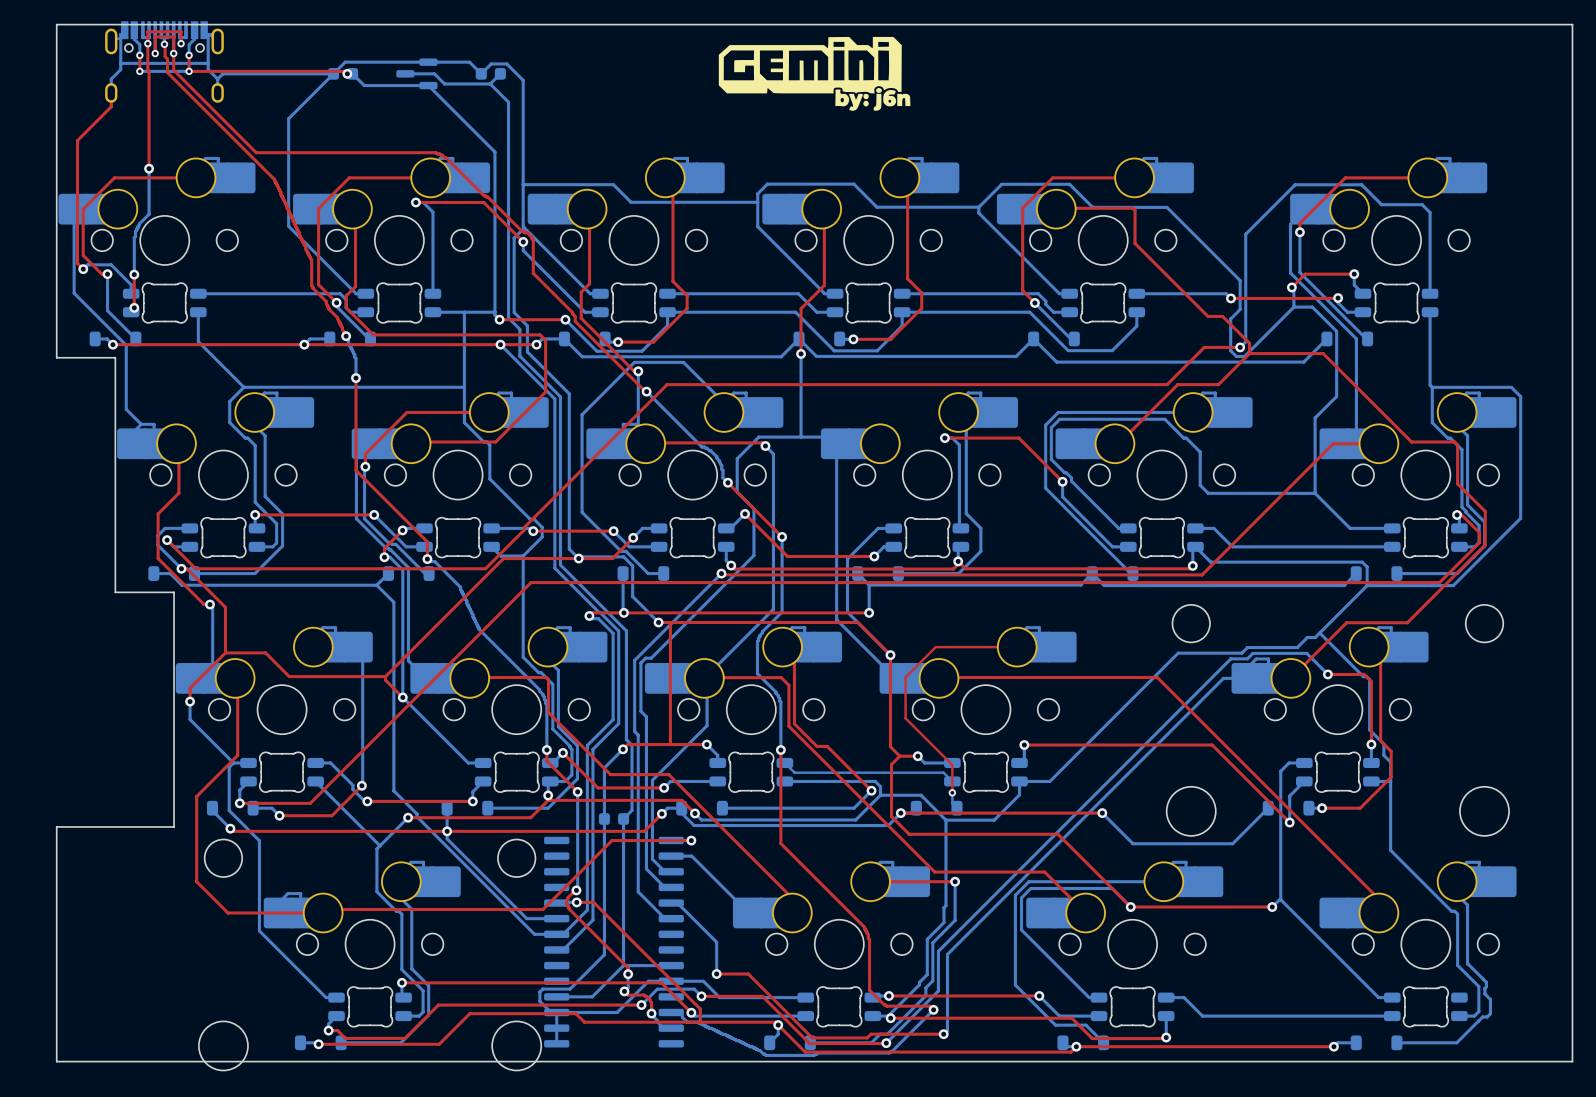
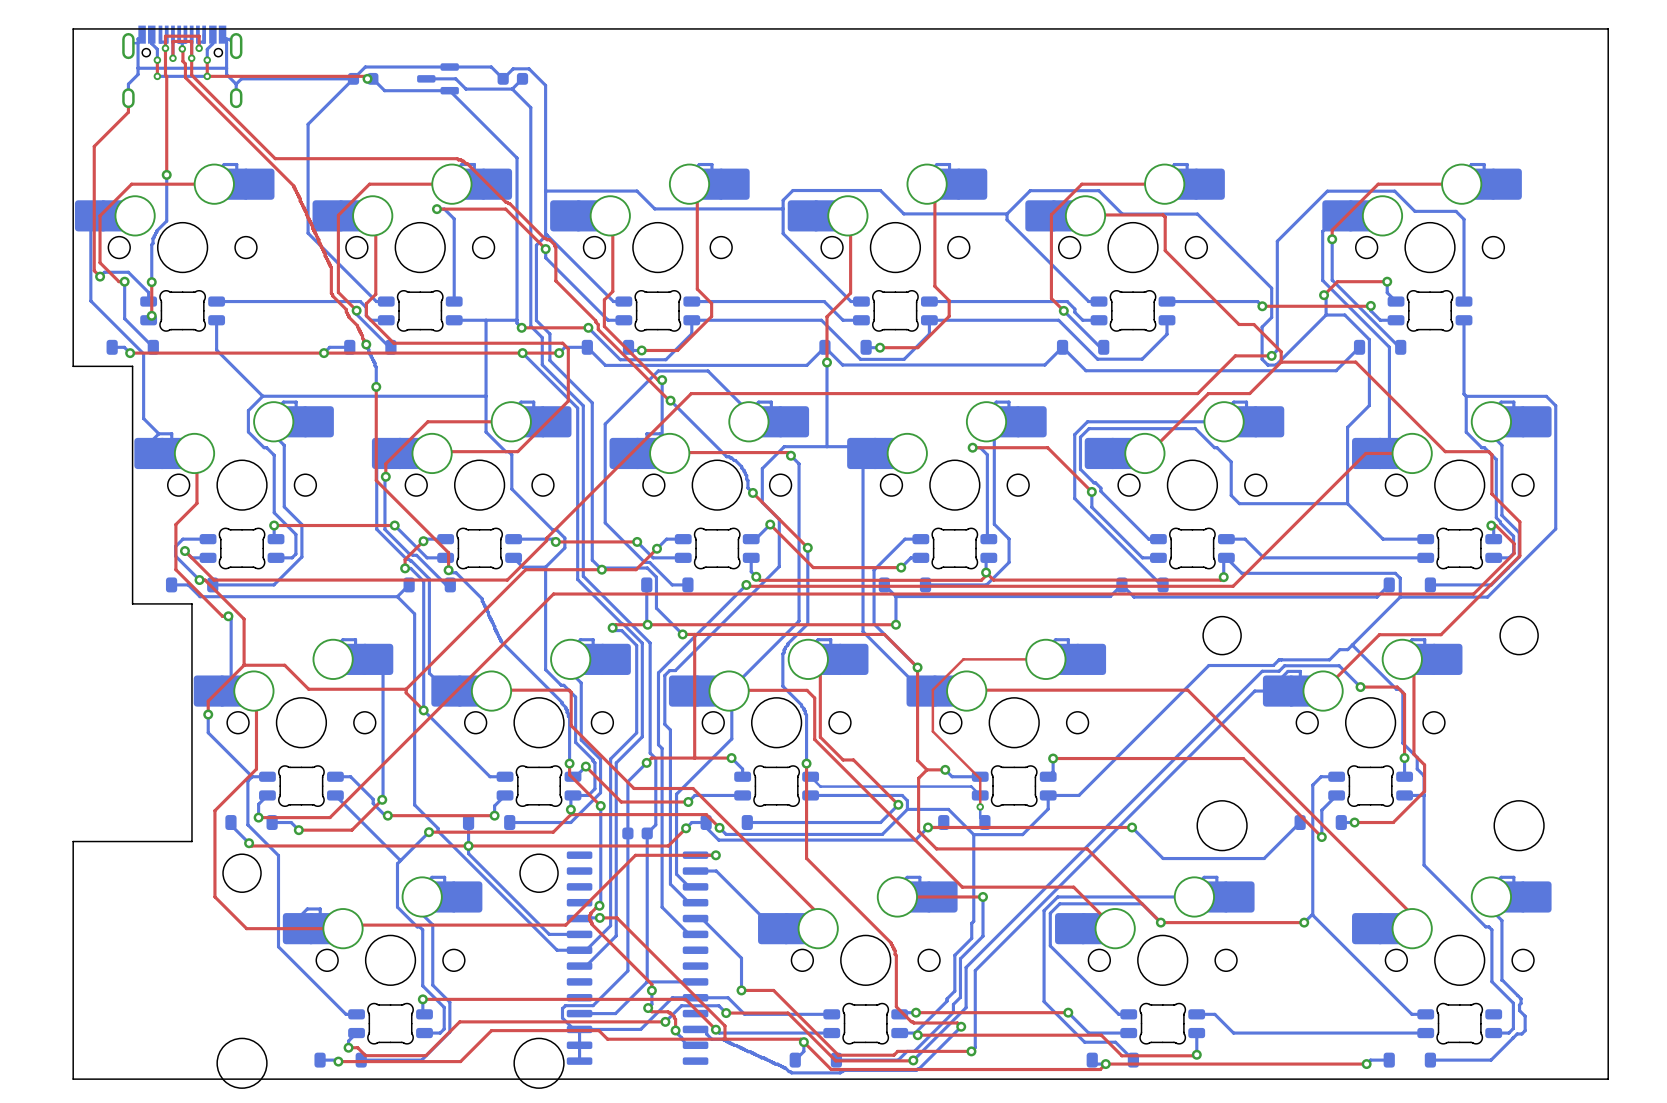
drawing: [718, 36, 911, 111] -> none

